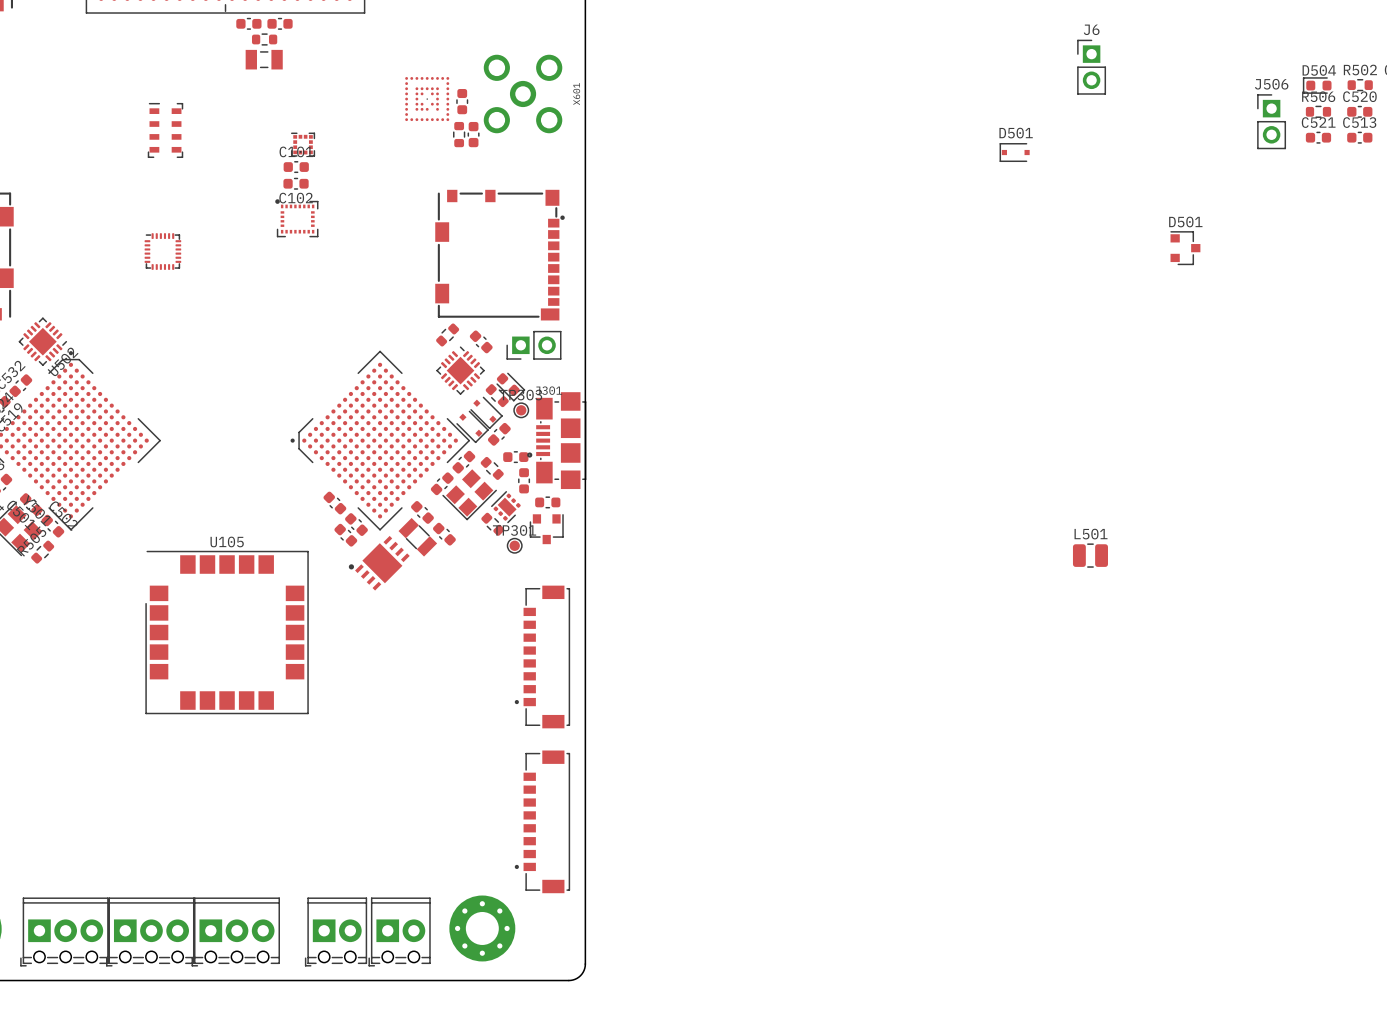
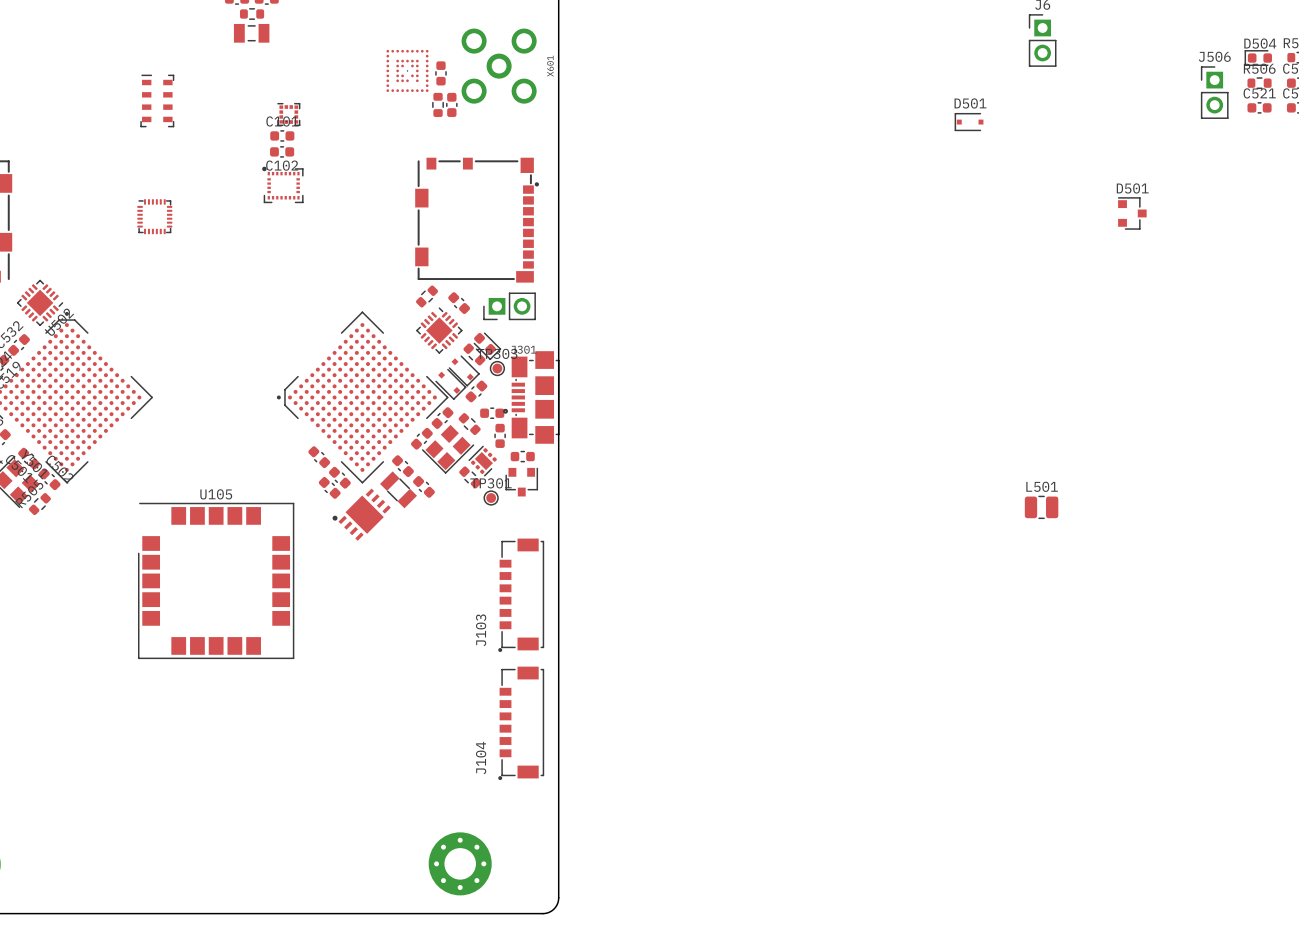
J103: none -> (521, 595)
part: (542, 656) -> none
J104: none -> (521, 723)
part: (542, 821) -> none
part: (64, 931) -> none
part: (150, 931) -> none
part: (235, 931) -> none
part: (336, 931) -> none
part: (399, 931) -> none

